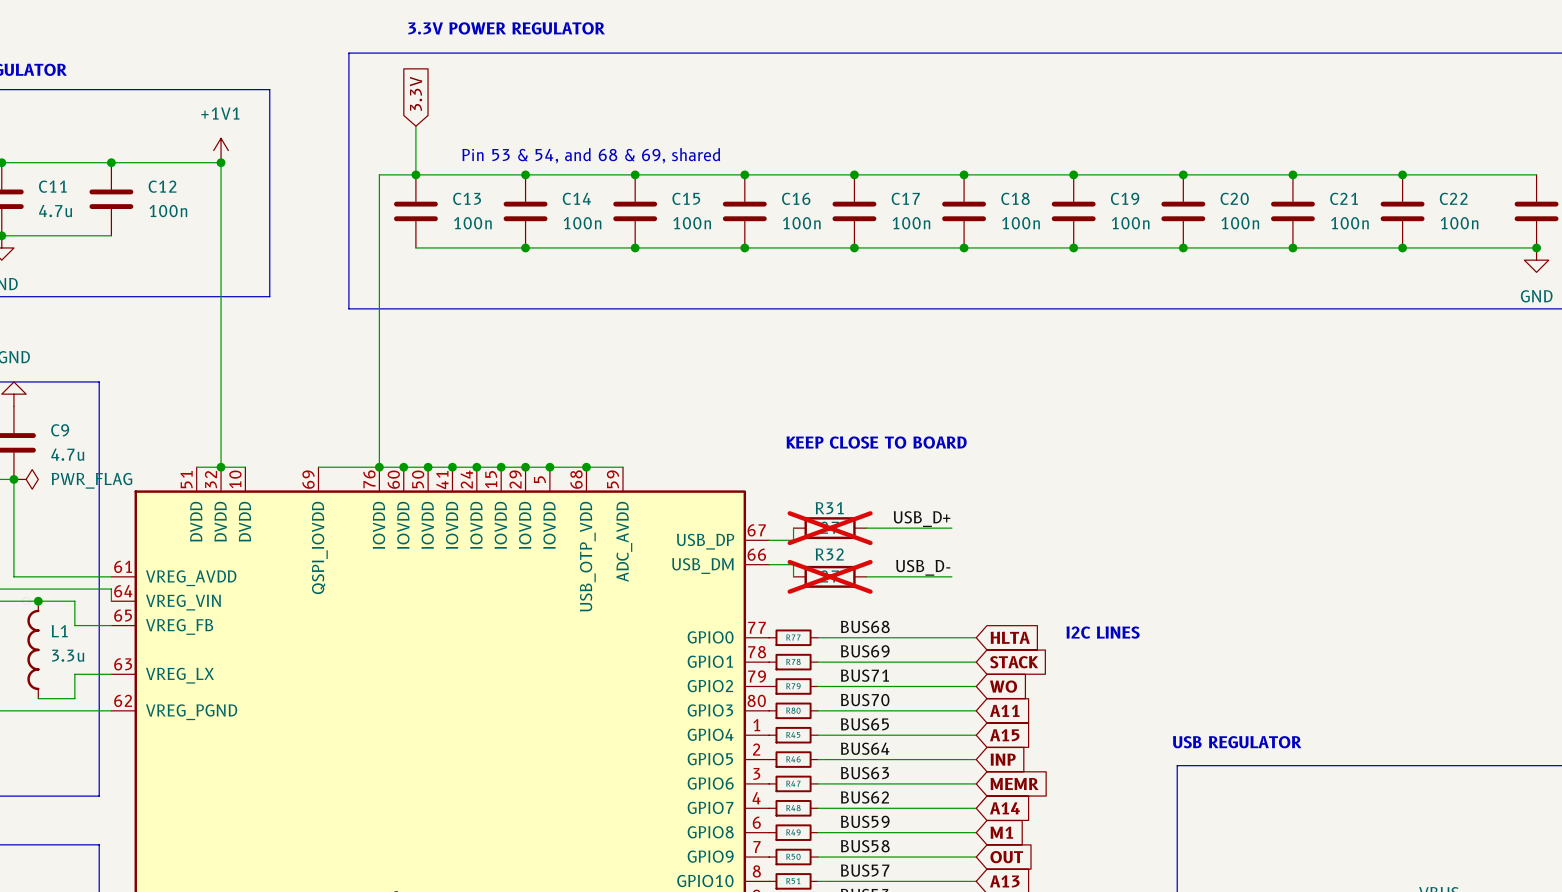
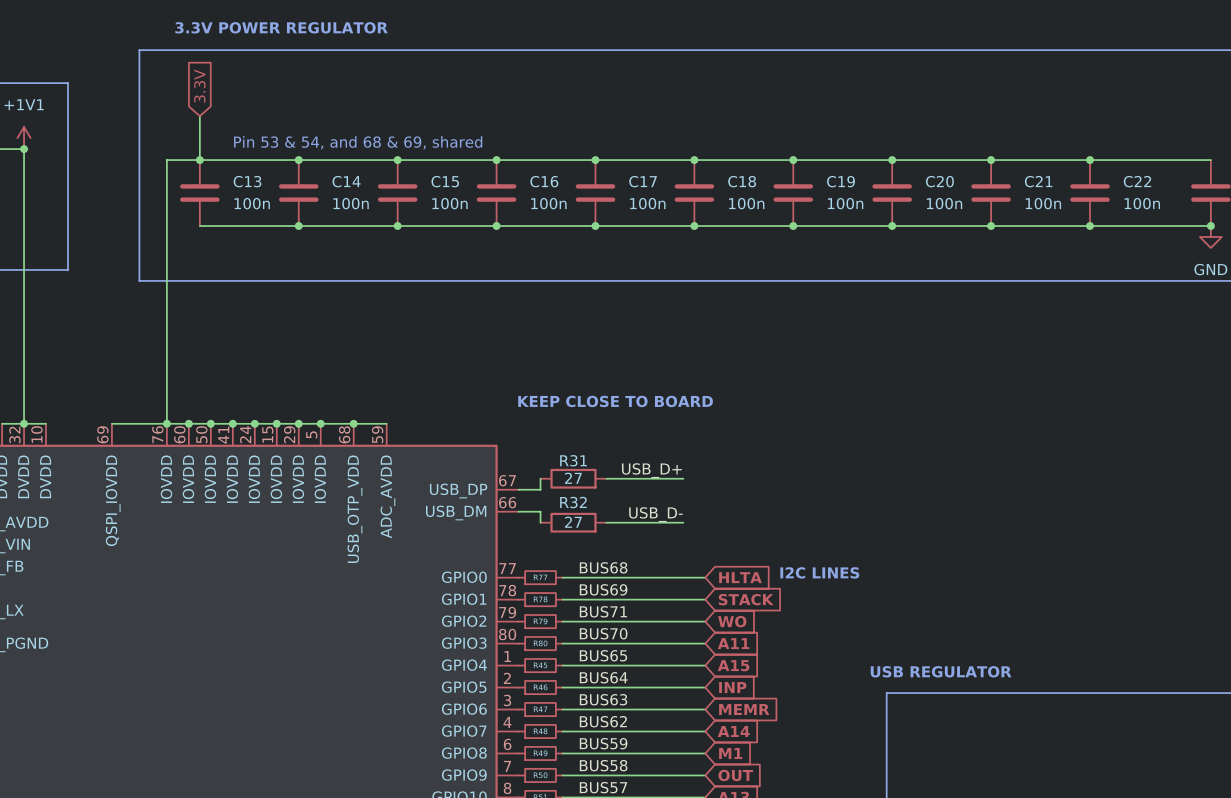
R31 do-not-place cross: (830, 528) -> none
R32 do-not-place cross: (830, 576) -> none

